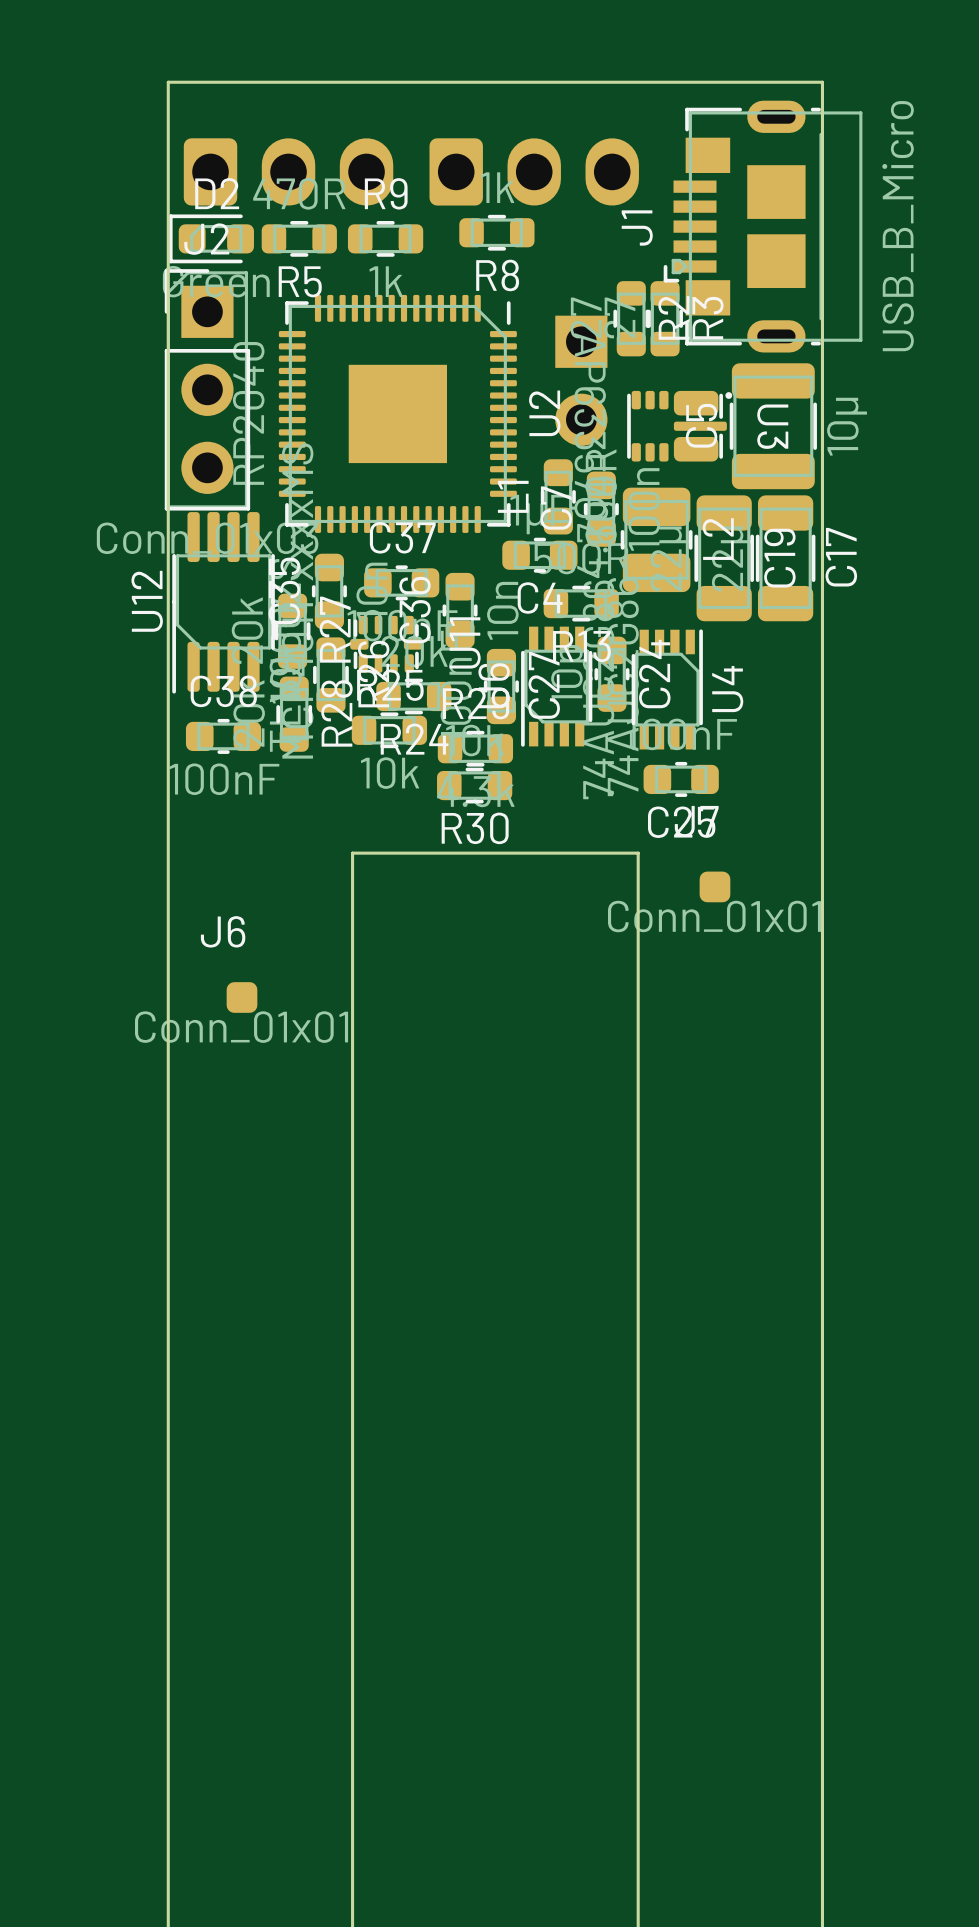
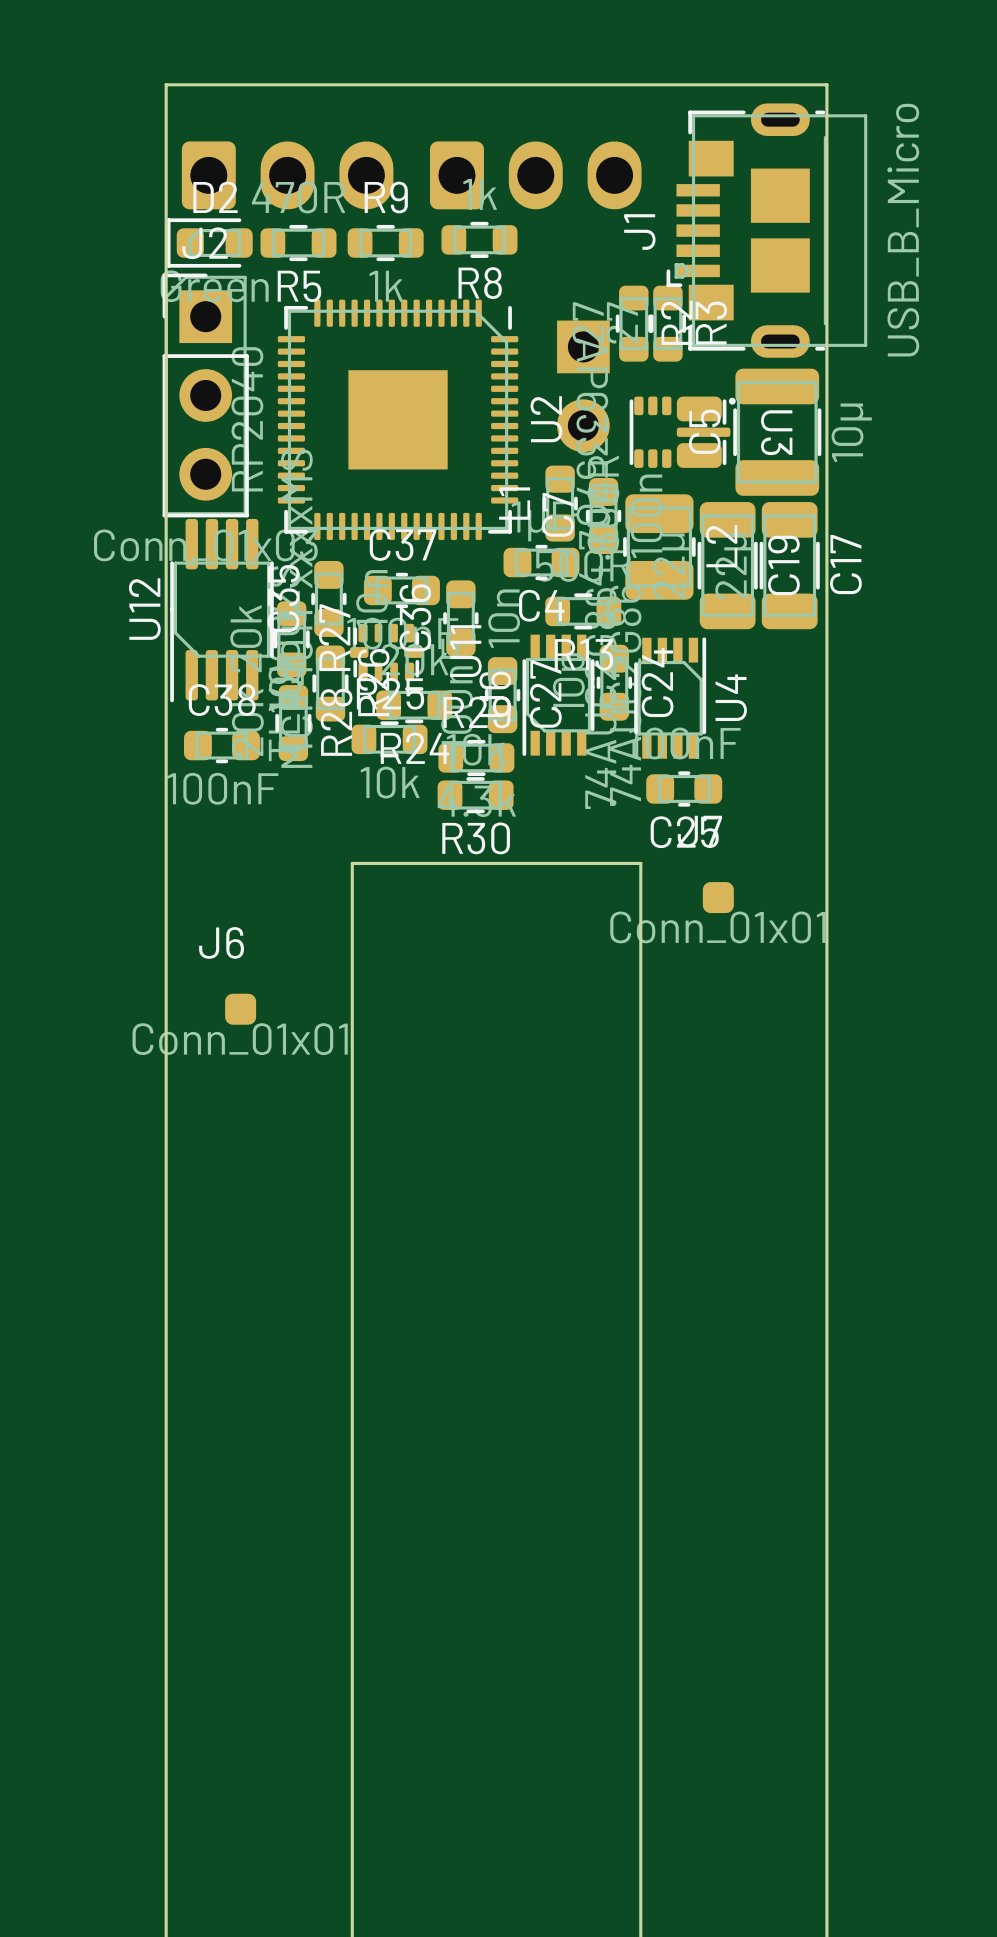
R8 position: (496, 232) -> (479, 239)

